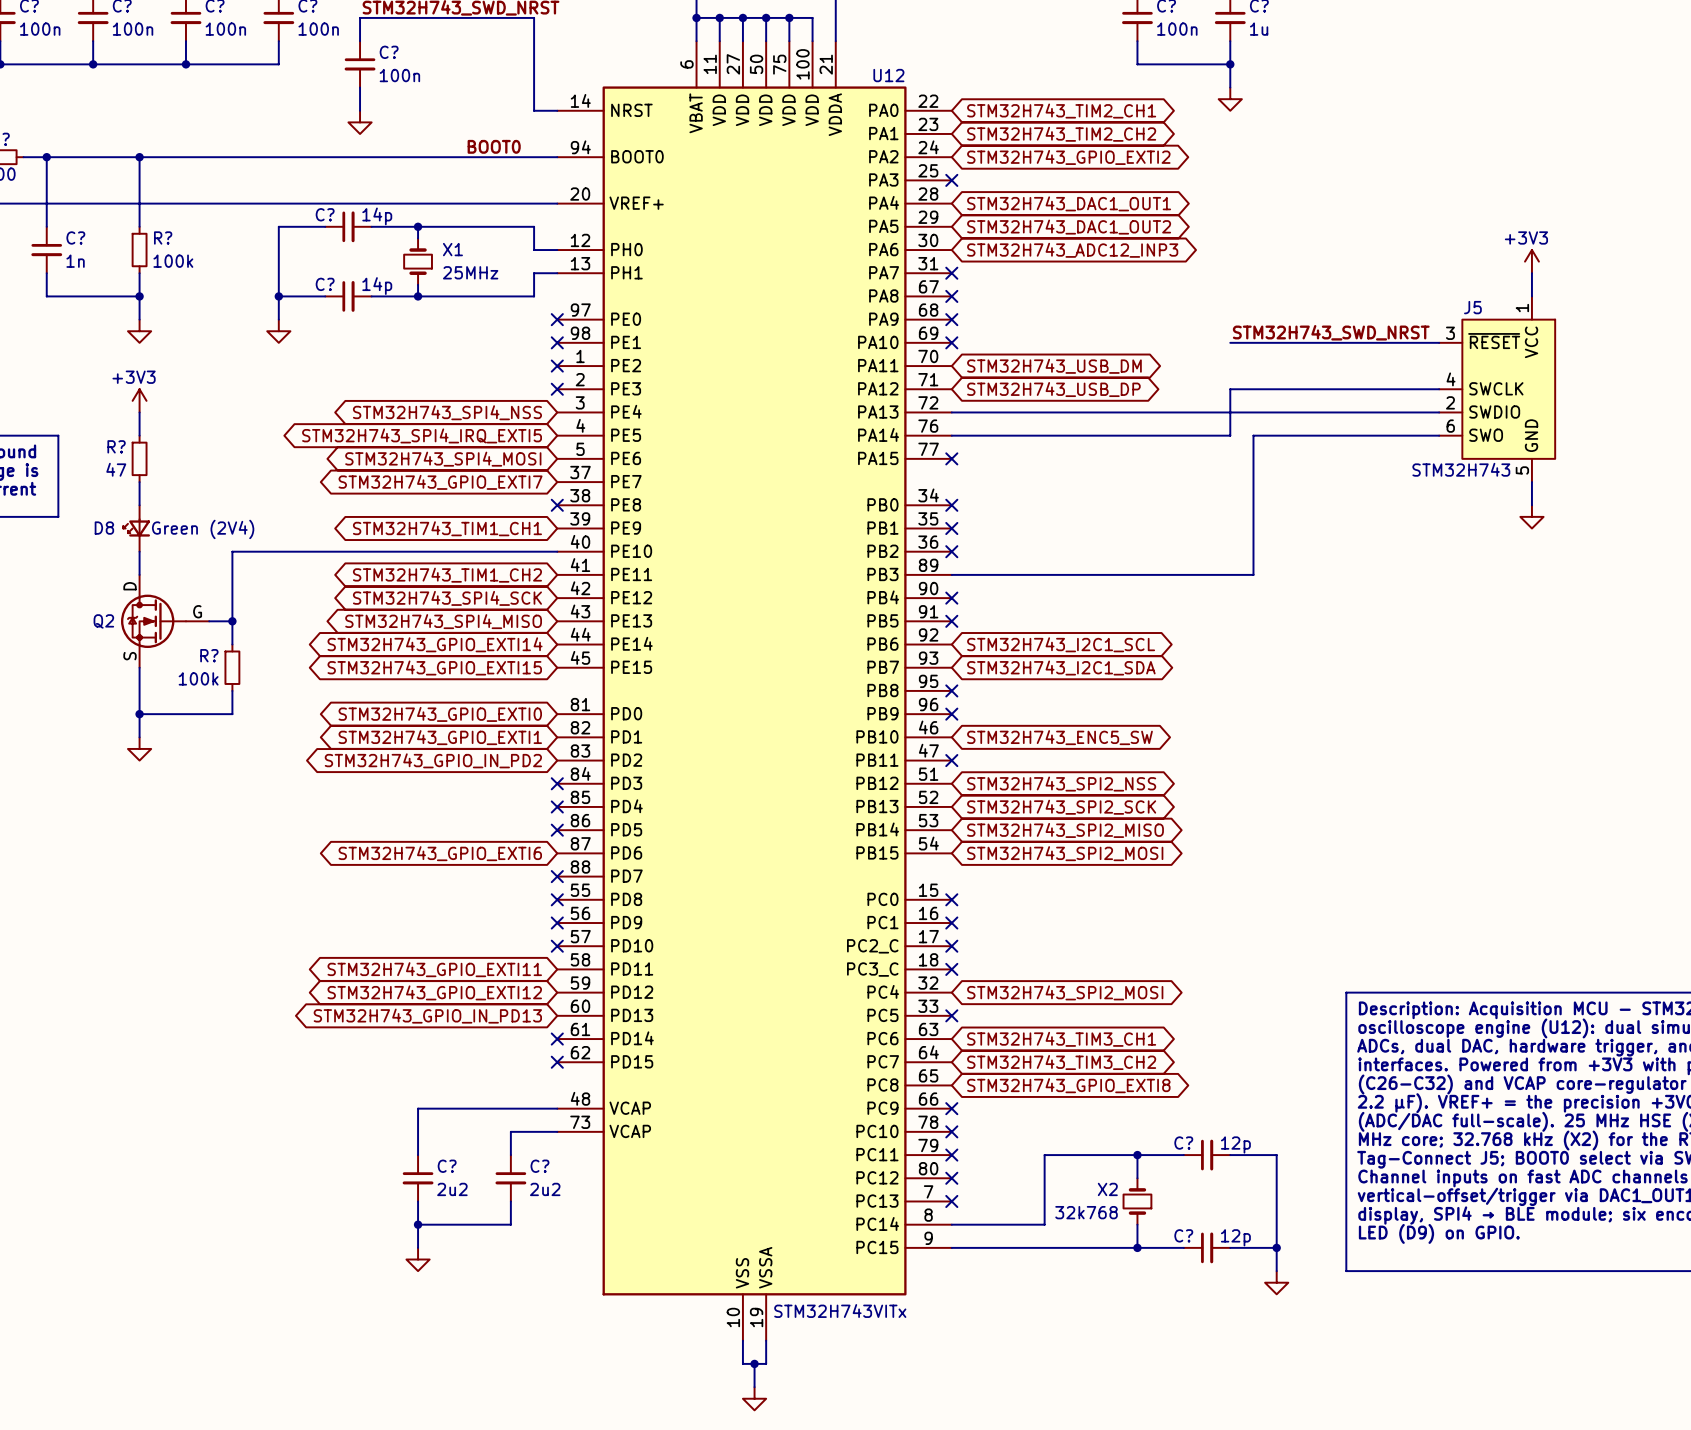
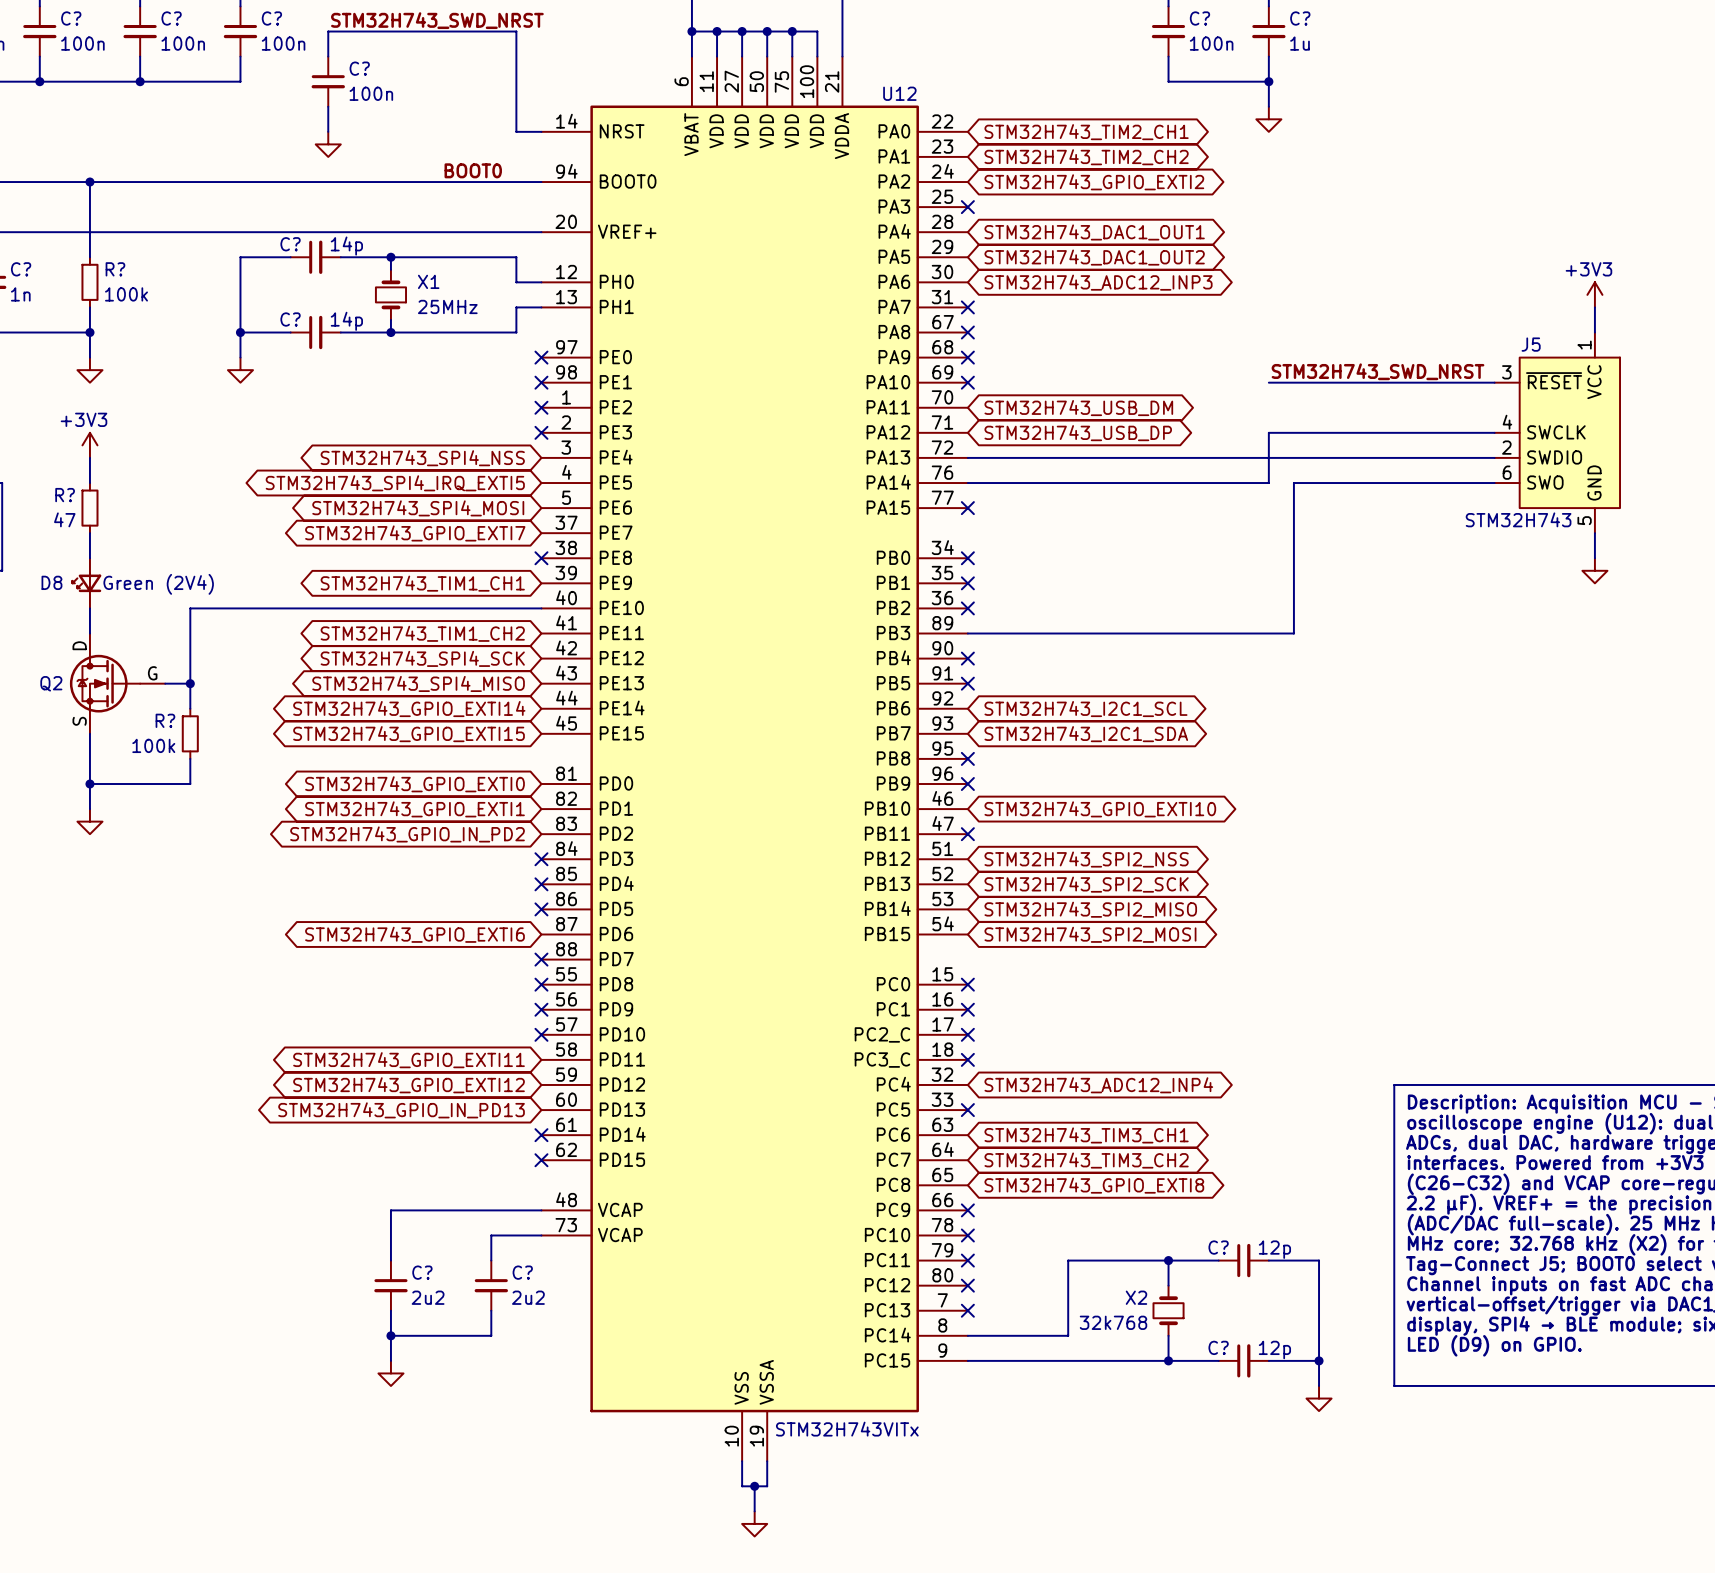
global label: STM32H743_ENC5_SW (1059, 737) -> STM32H743_GPIO_EXTI10 (1100, 809)
global label: STM32H743_SPI2_MOSI (1065, 992) -> STM32H743_ADC12_INP4 (1098, 1085)

